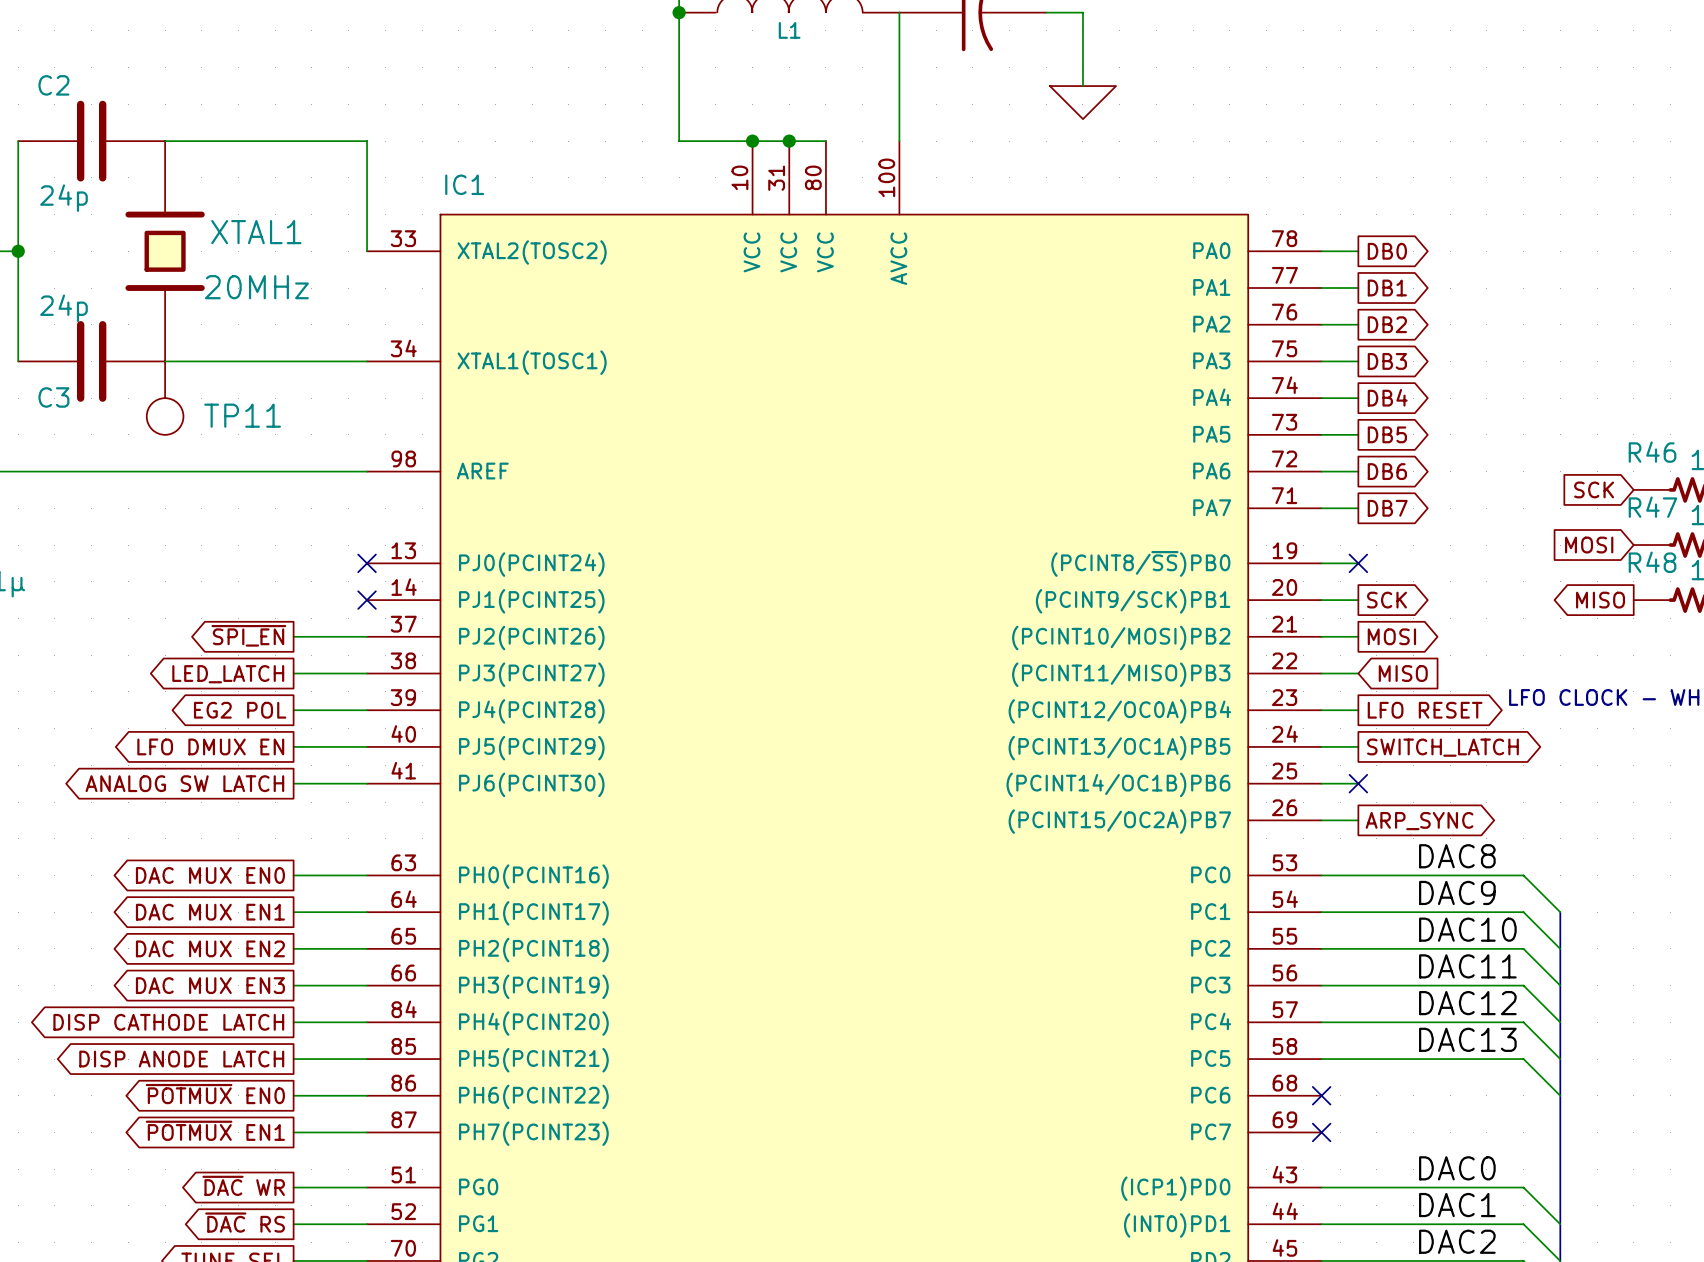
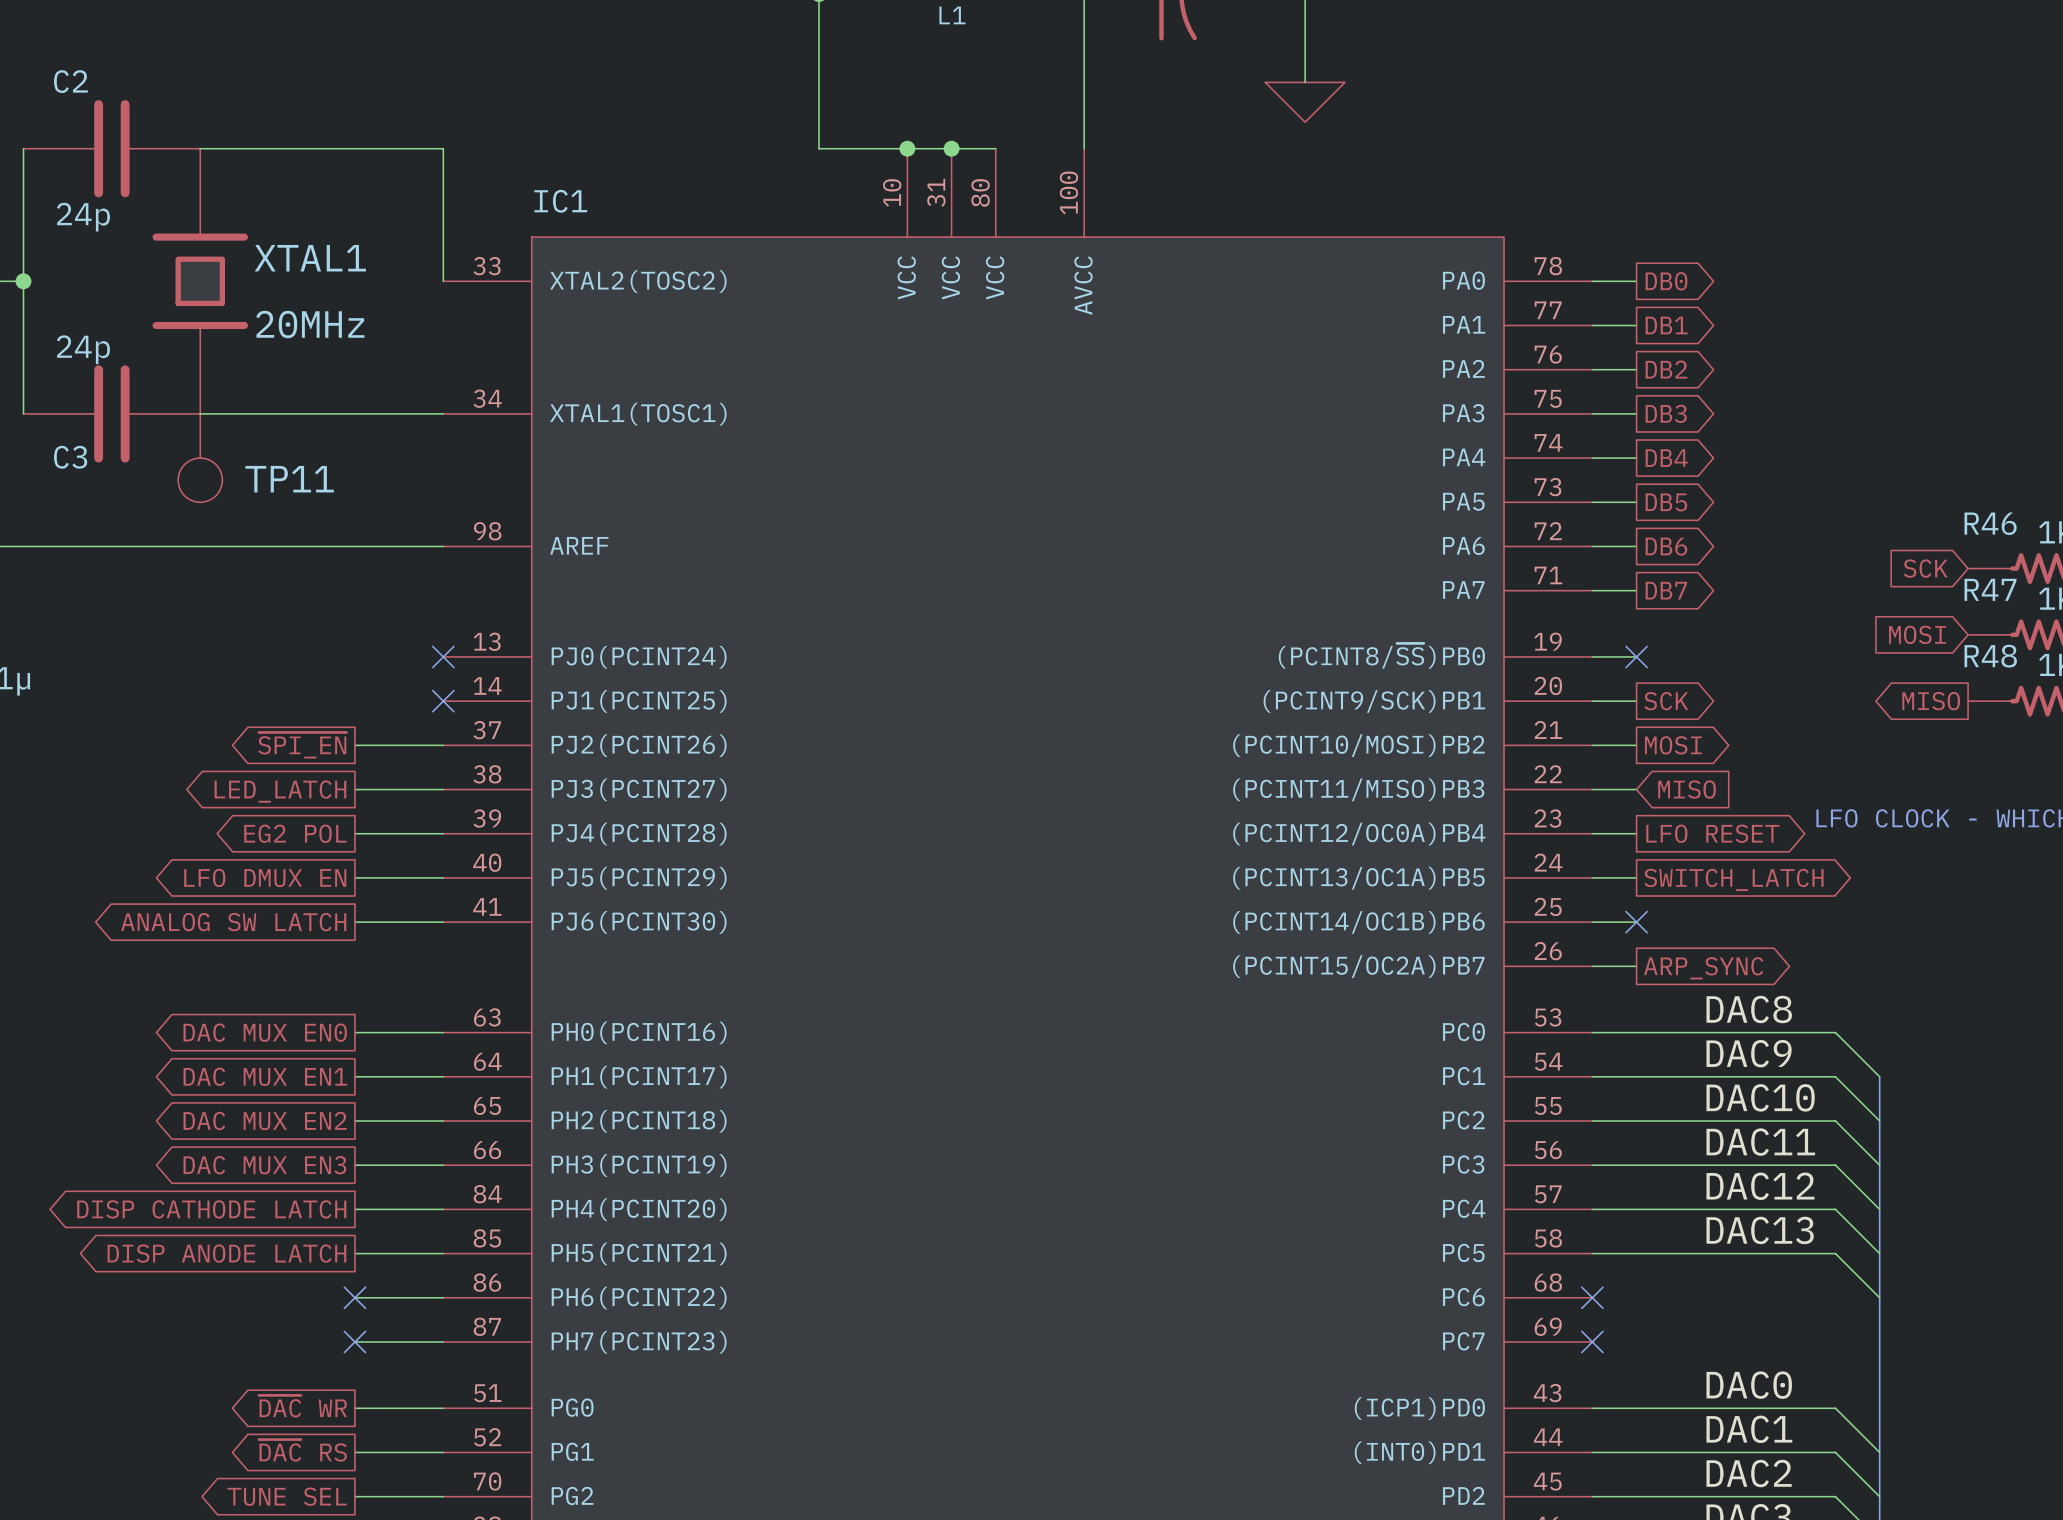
global label: ~{POTMUX} EN0 (215, 1094) -> none
no-connect mark: none -> (354, 1297)
global label: ~{POTMUX} EN1 (215, 1130) -> none
no-connect mark: none -> (354, 1341)

